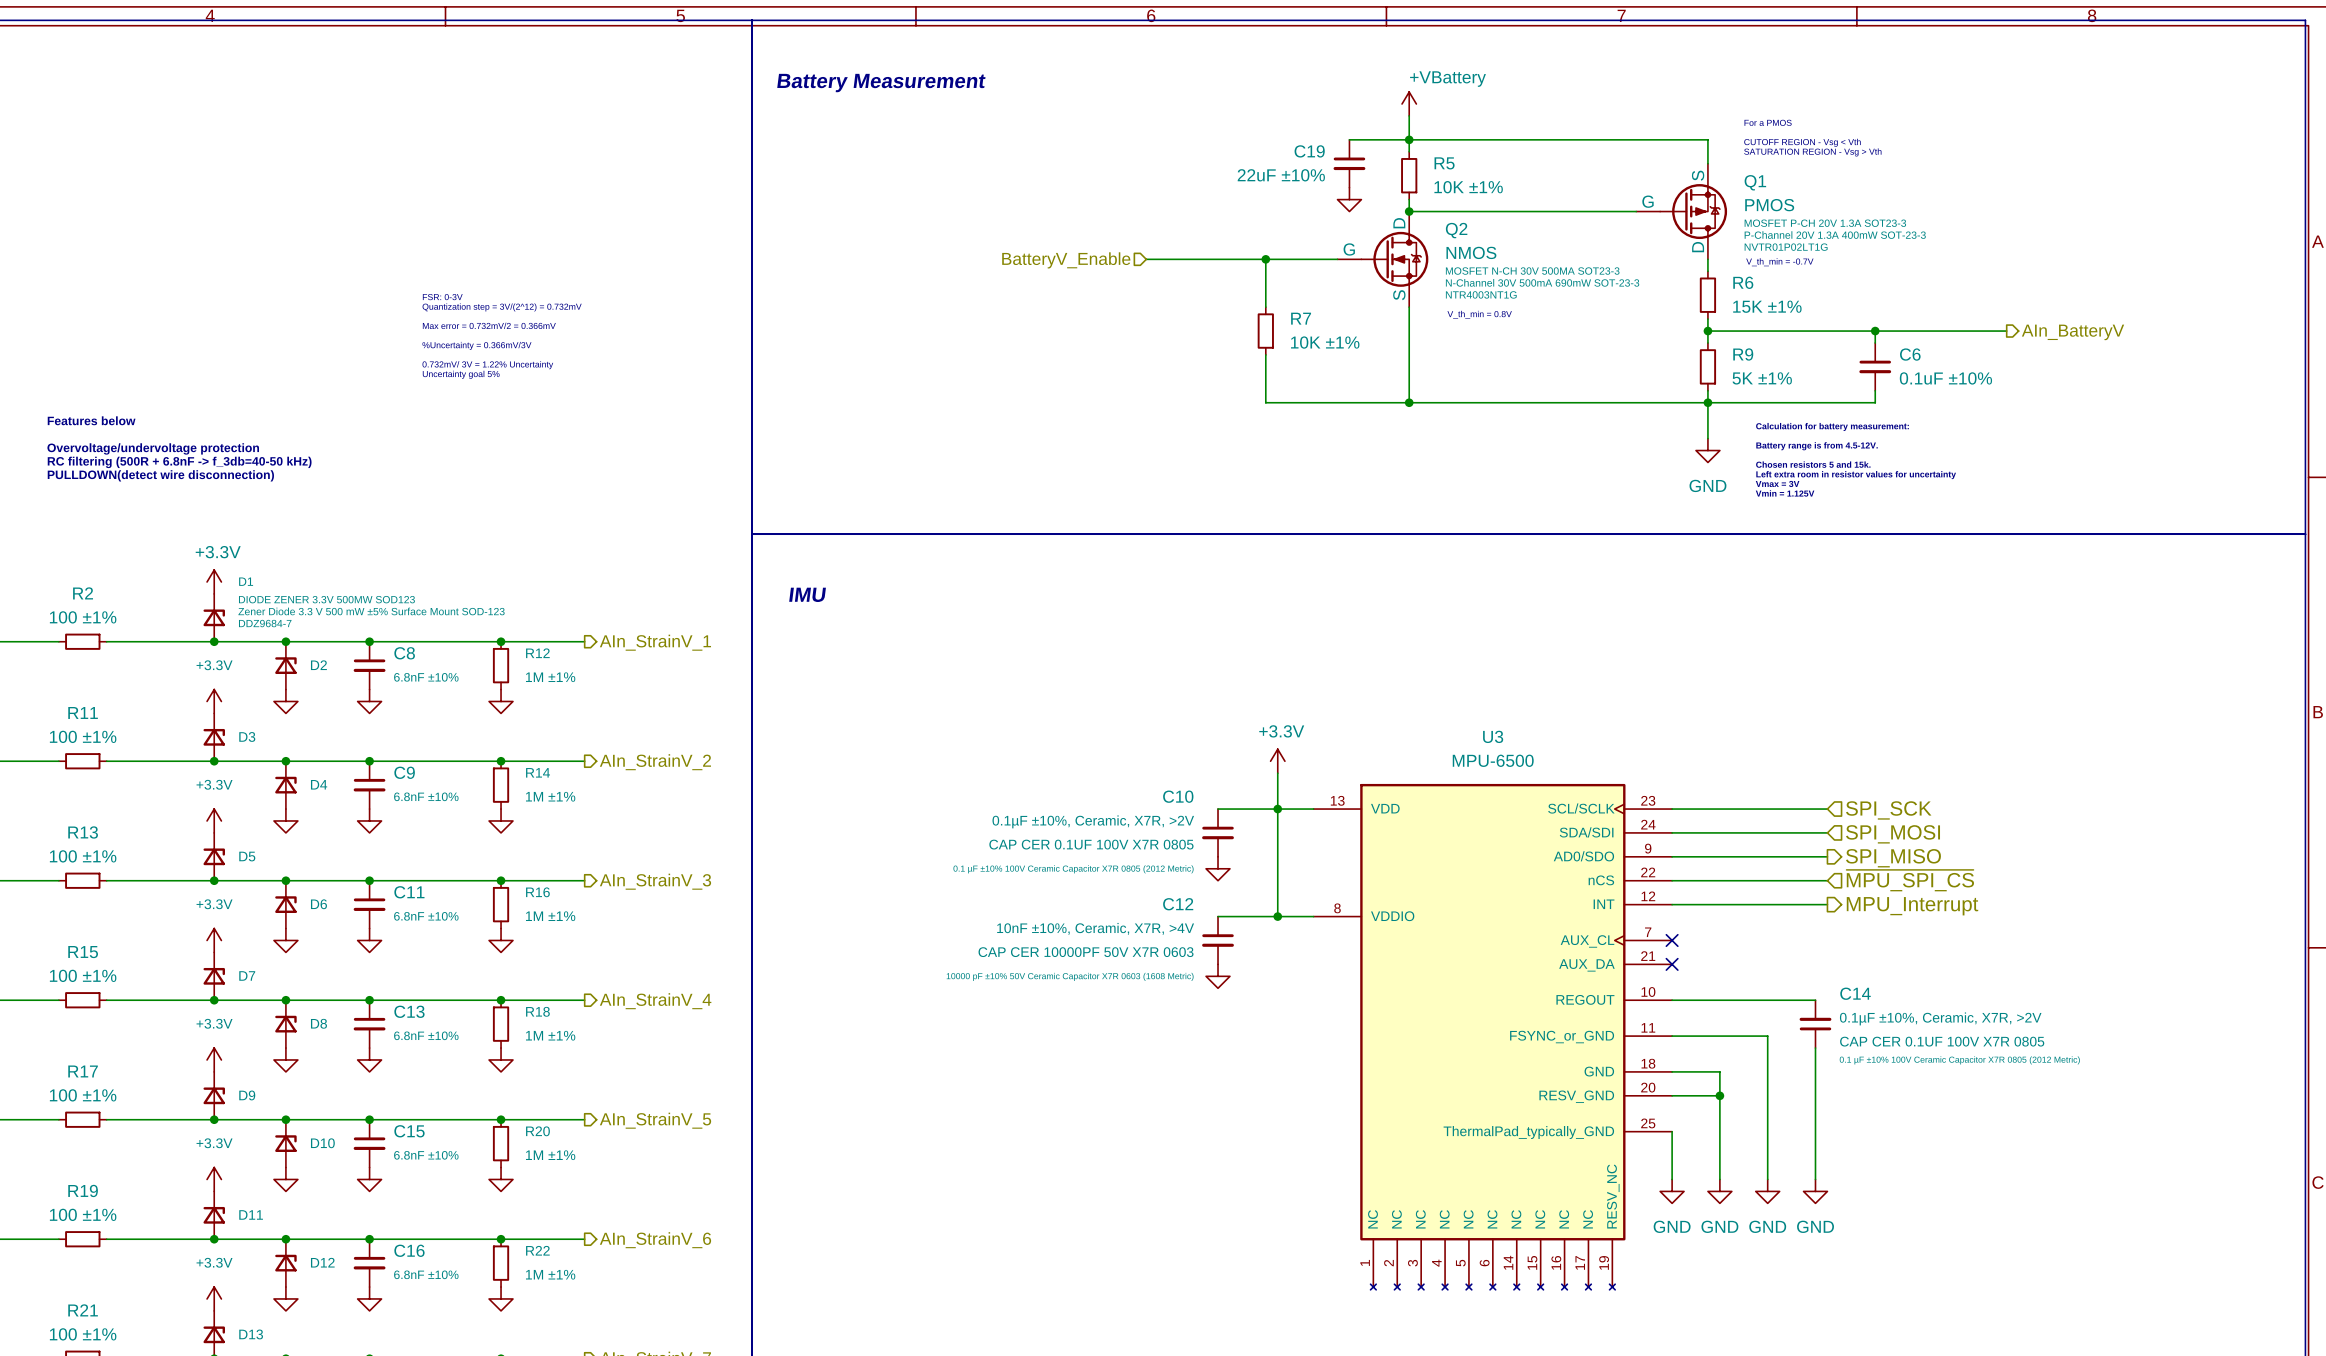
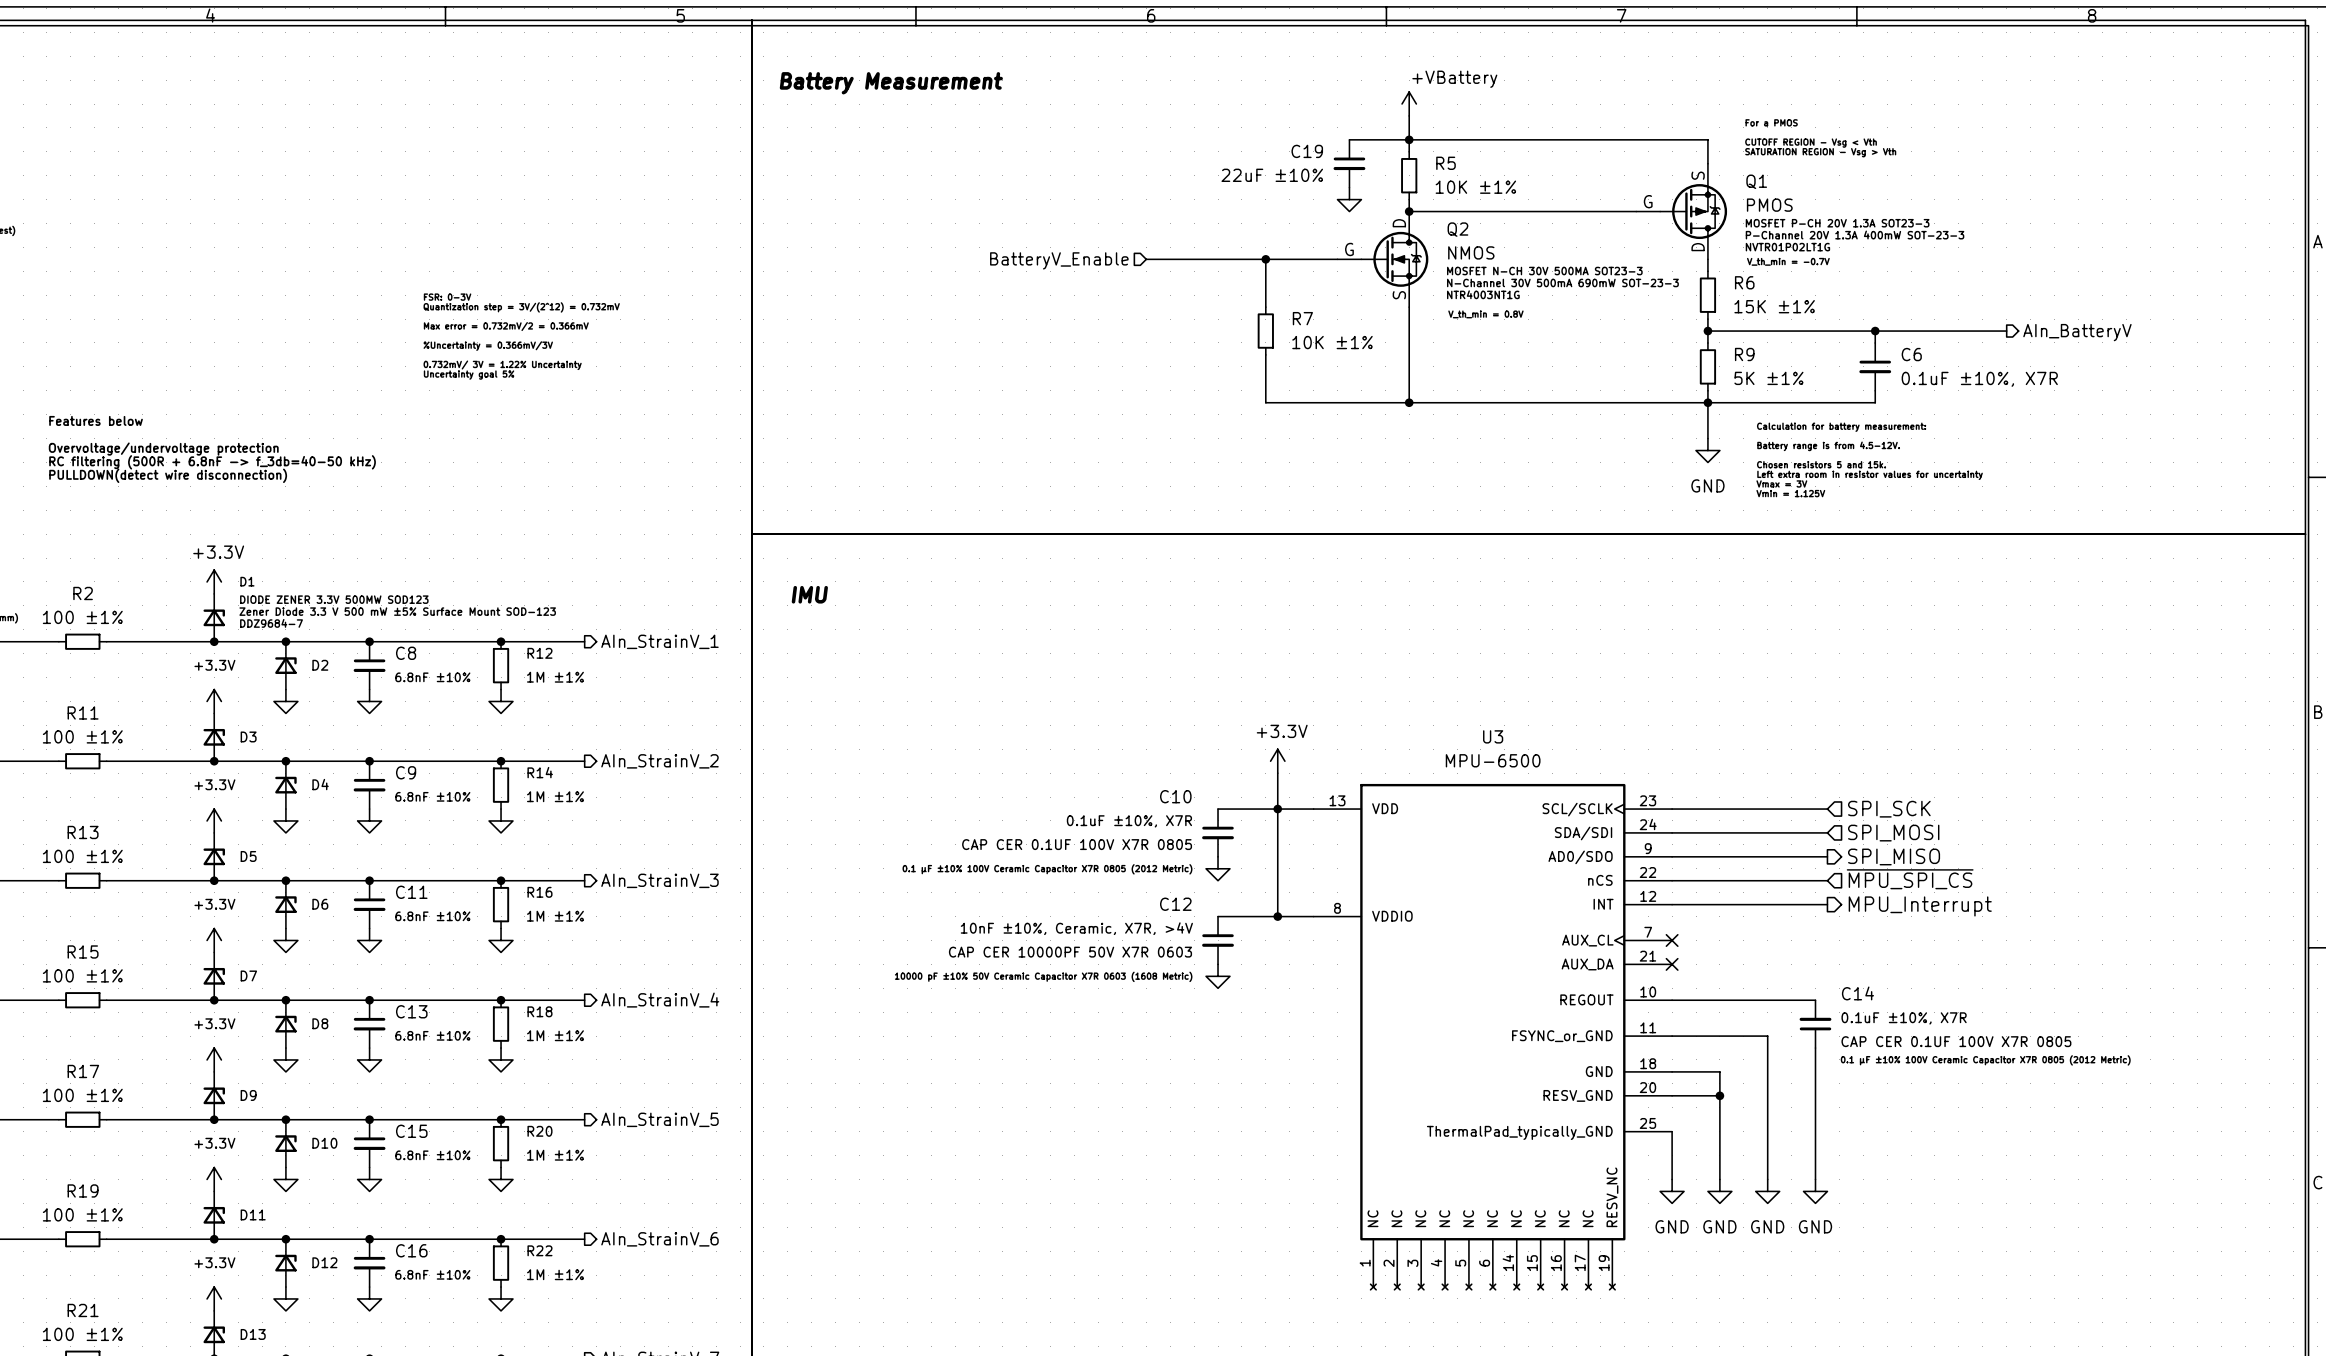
C6 value: 0.1uF ±10% (1945, 378) -> 0.1uF ±10%, X7R (1979, 379)
C10 value: 0.1µF ±10%, Ceramic, X7R, >2V (1093, 821) -> 0.1uF ±10%, X7R (1129, 821)
C14 value: 0.1µF ±10%, Ceramic, X7R, >2V (1940, 1018) -> 0.1uF ±10%, X7R (1904, 1018)

